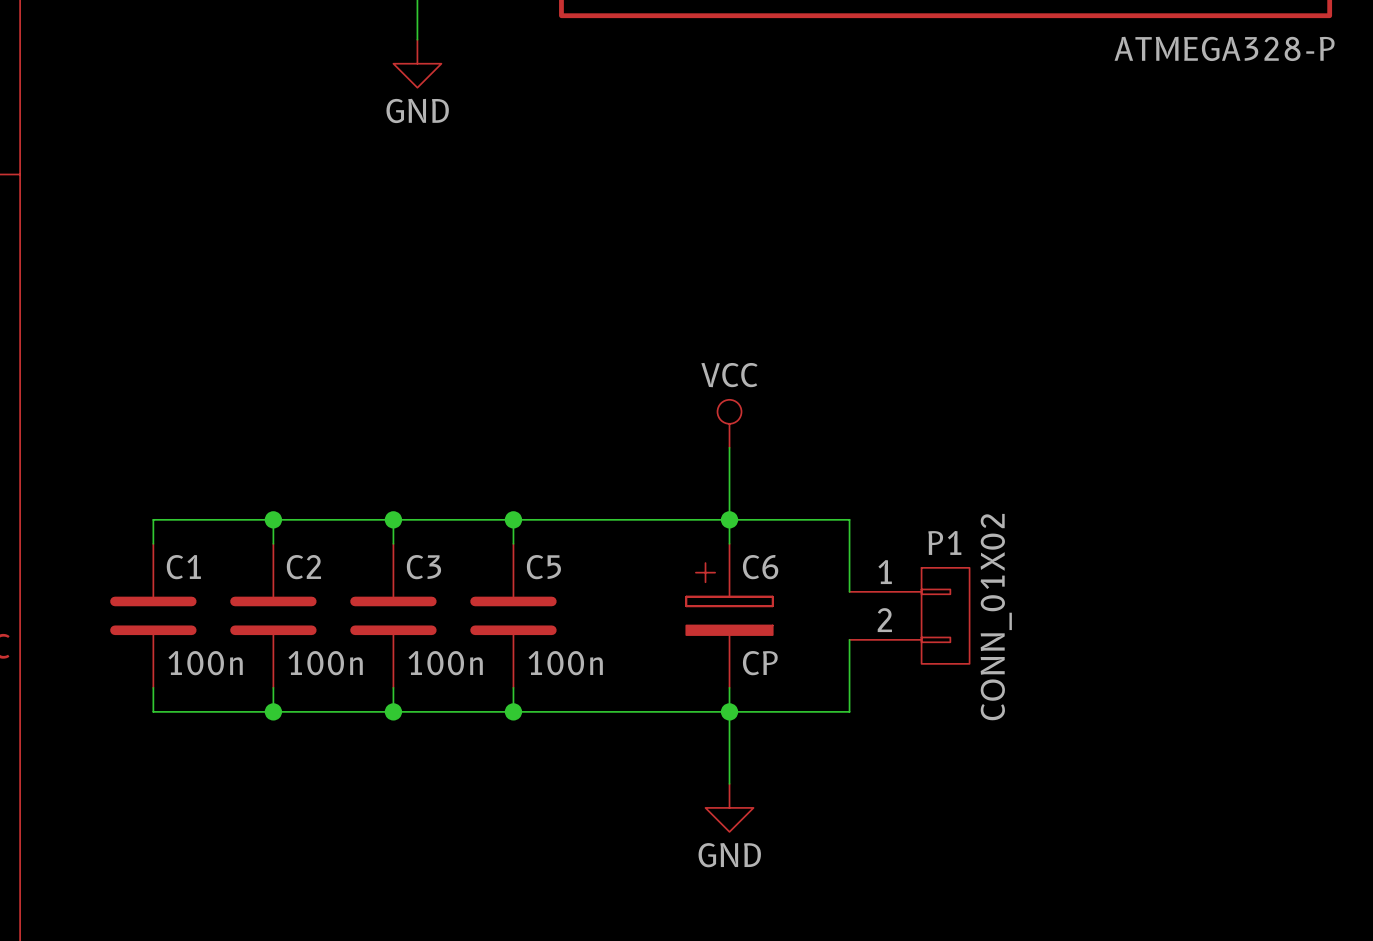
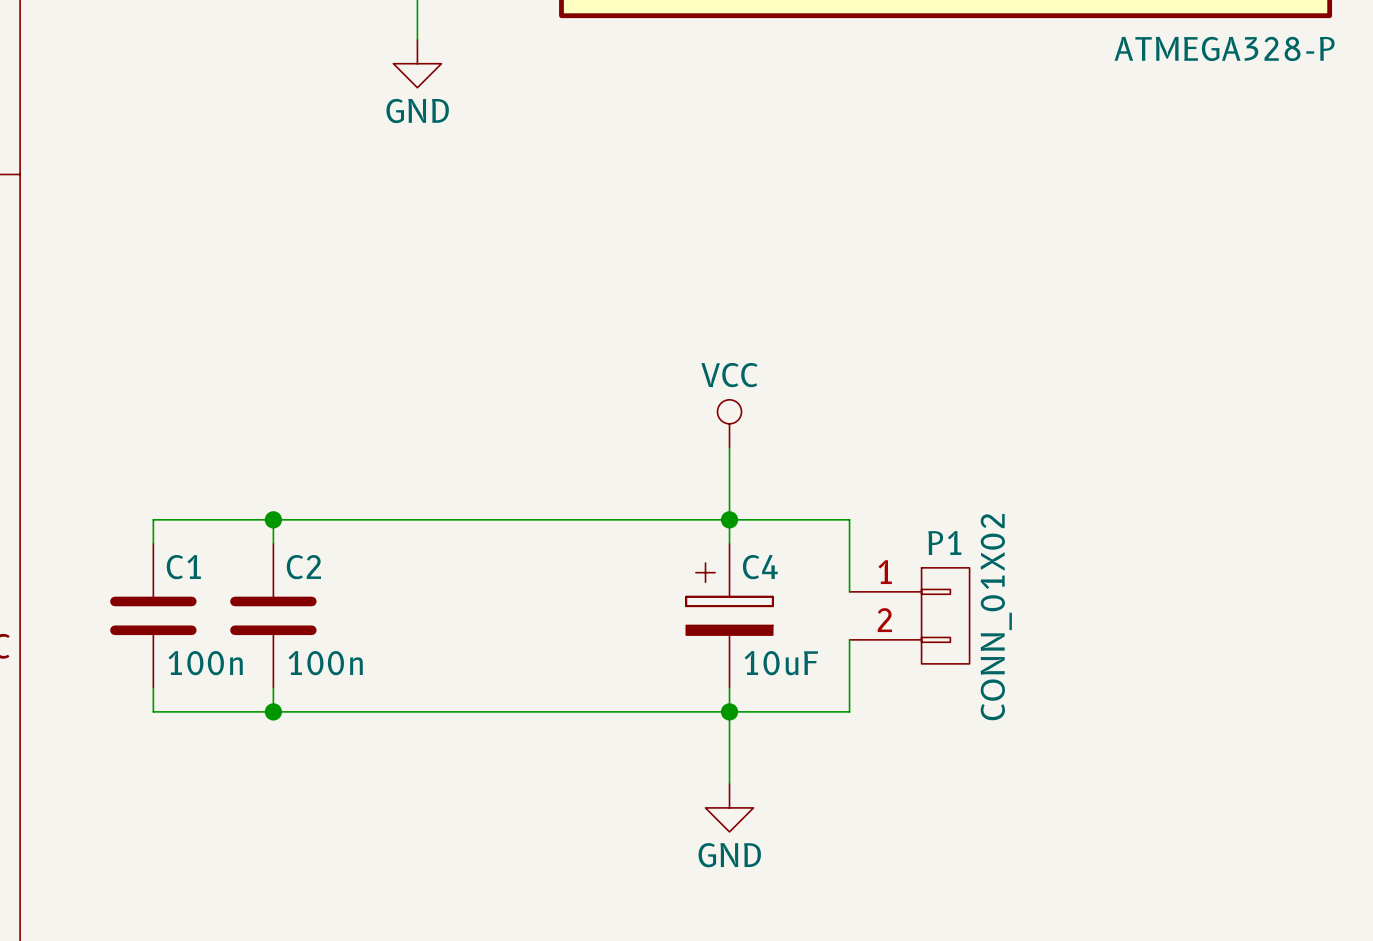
wire: (393, 519) (393, 543) -> none
junction: (393, 519) -> none
wire: (513, 519) (513, 543) -> none
junction: (513, 519) -> none
C6 name: C6 (760, 567) -> C4 (760, 567)
C3: 100n (393, 615) -> none
C5: 100n (513, 615) -> none
C6 value: CP (760, 663) -> 10uF (781, 663)
wire: (393, 687) (393, 711) -> none
wire: (513, 687) (513, 711) -> none
junction: (393, 711) -> none
junction: (513, 711) -> none

